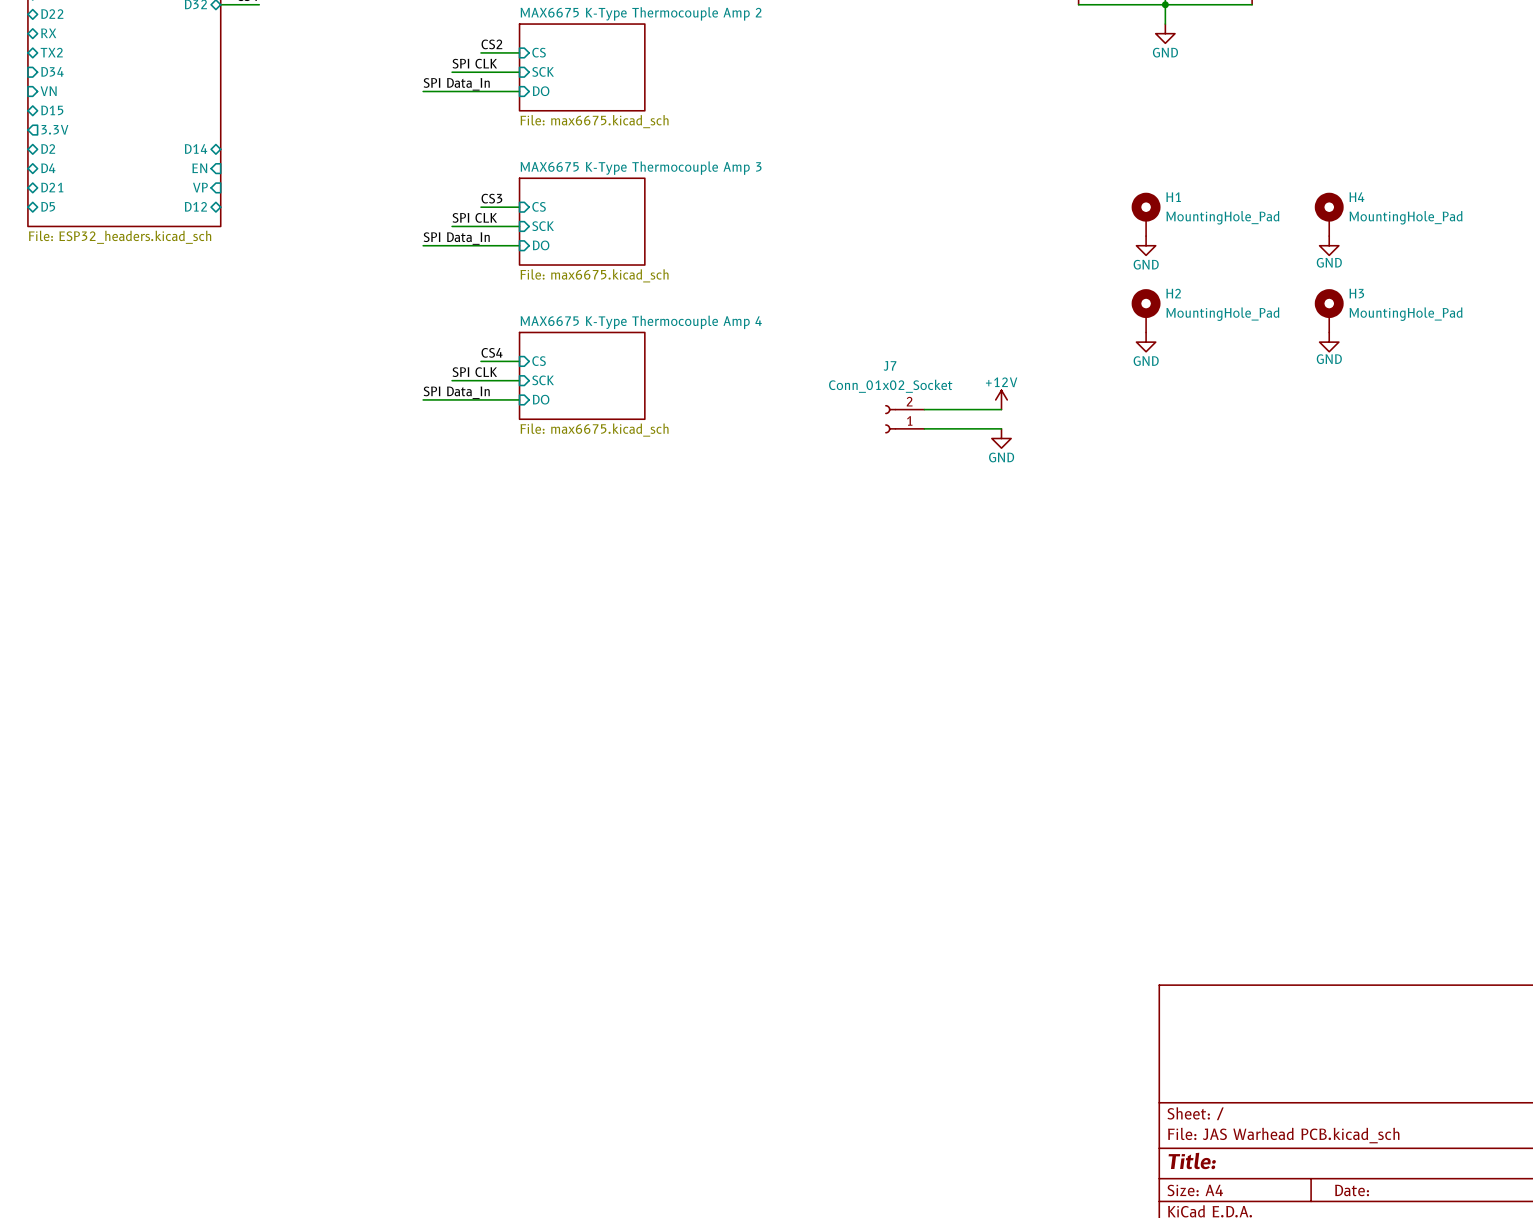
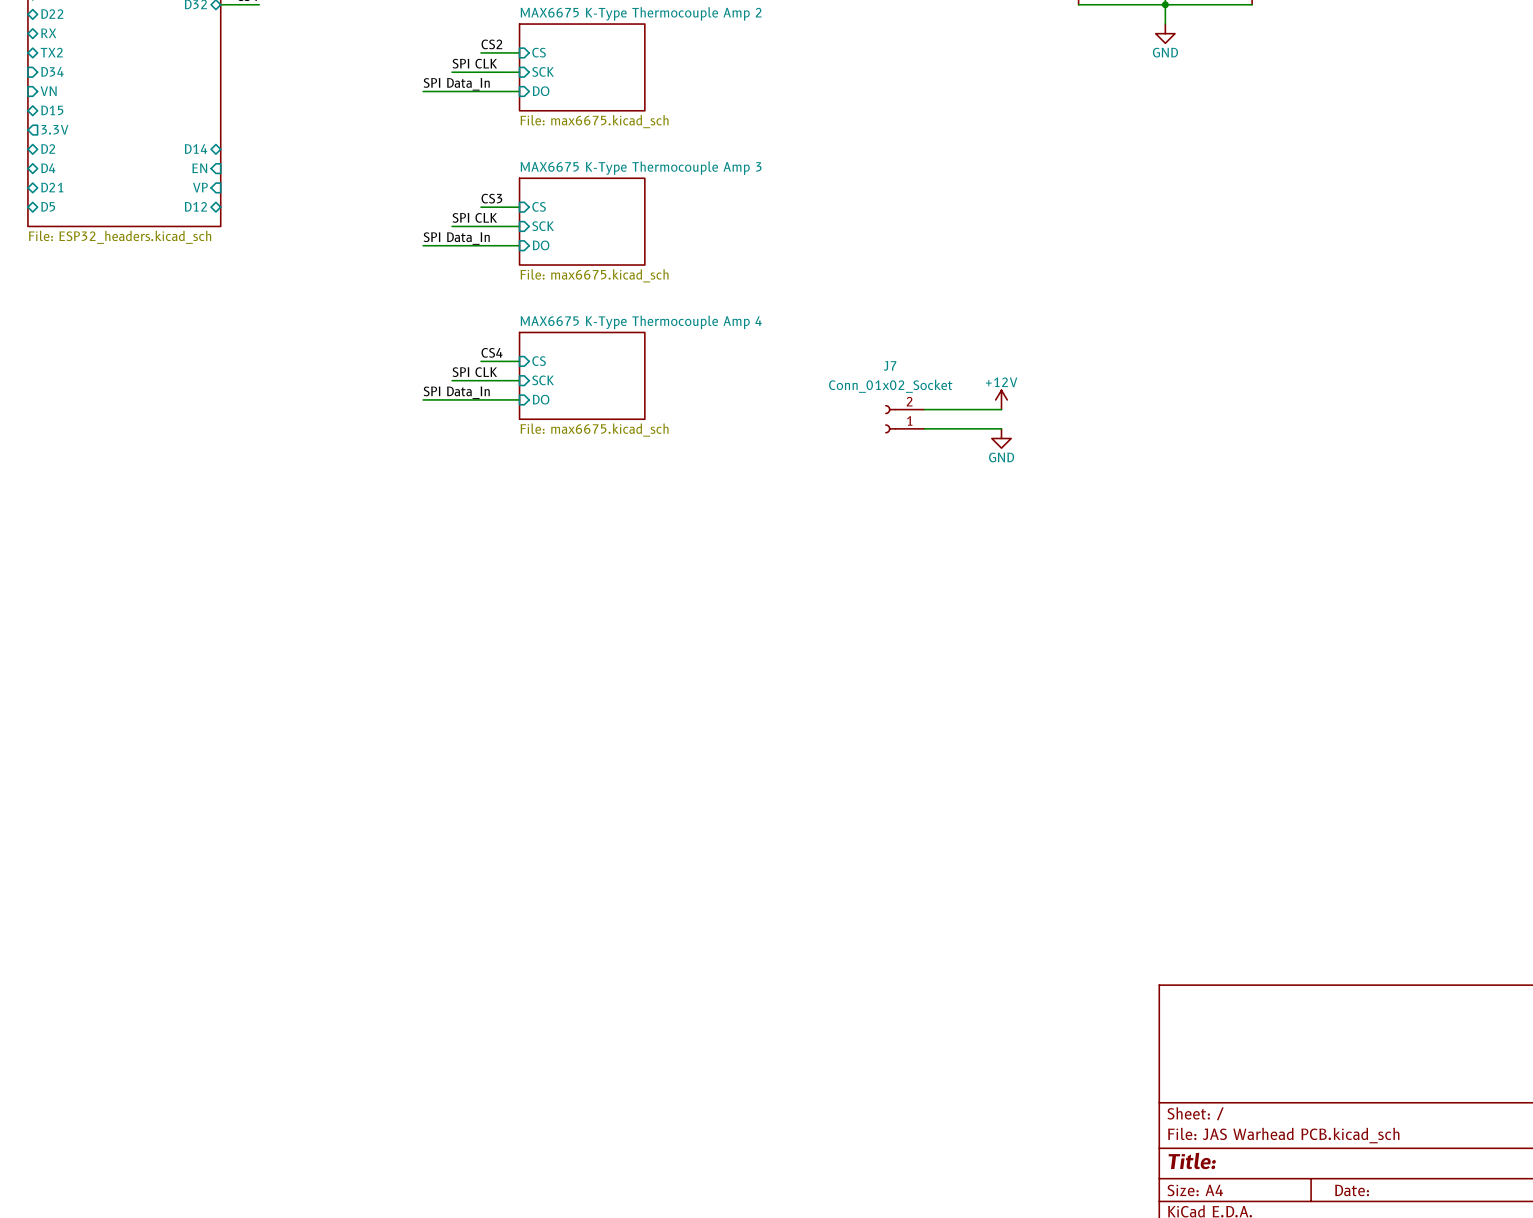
H1: MountingHole_Pad (1146, 214) -> none
H4: MountingHole_Pad (1329, 214) -> none
power symbol: GND (1146, 245) -> none
power symbol: GND (1329, 245) -> none
H2: MountingHole_Pad (1146, 310) -> none
H3: MountingHole_Pad (1329, 310) -> none
power symbol: GND (1146, 342) -> none
power symbol: GND (1329, 342) -> none

